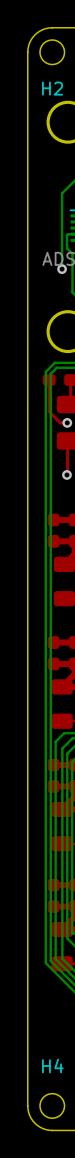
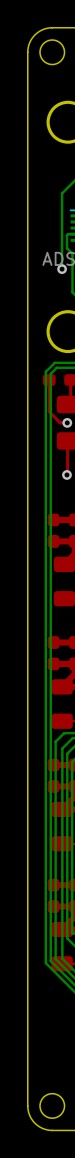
H2 name: H2 (52, 88) -> none
H4 name: H4 (52, 1065) -> none

